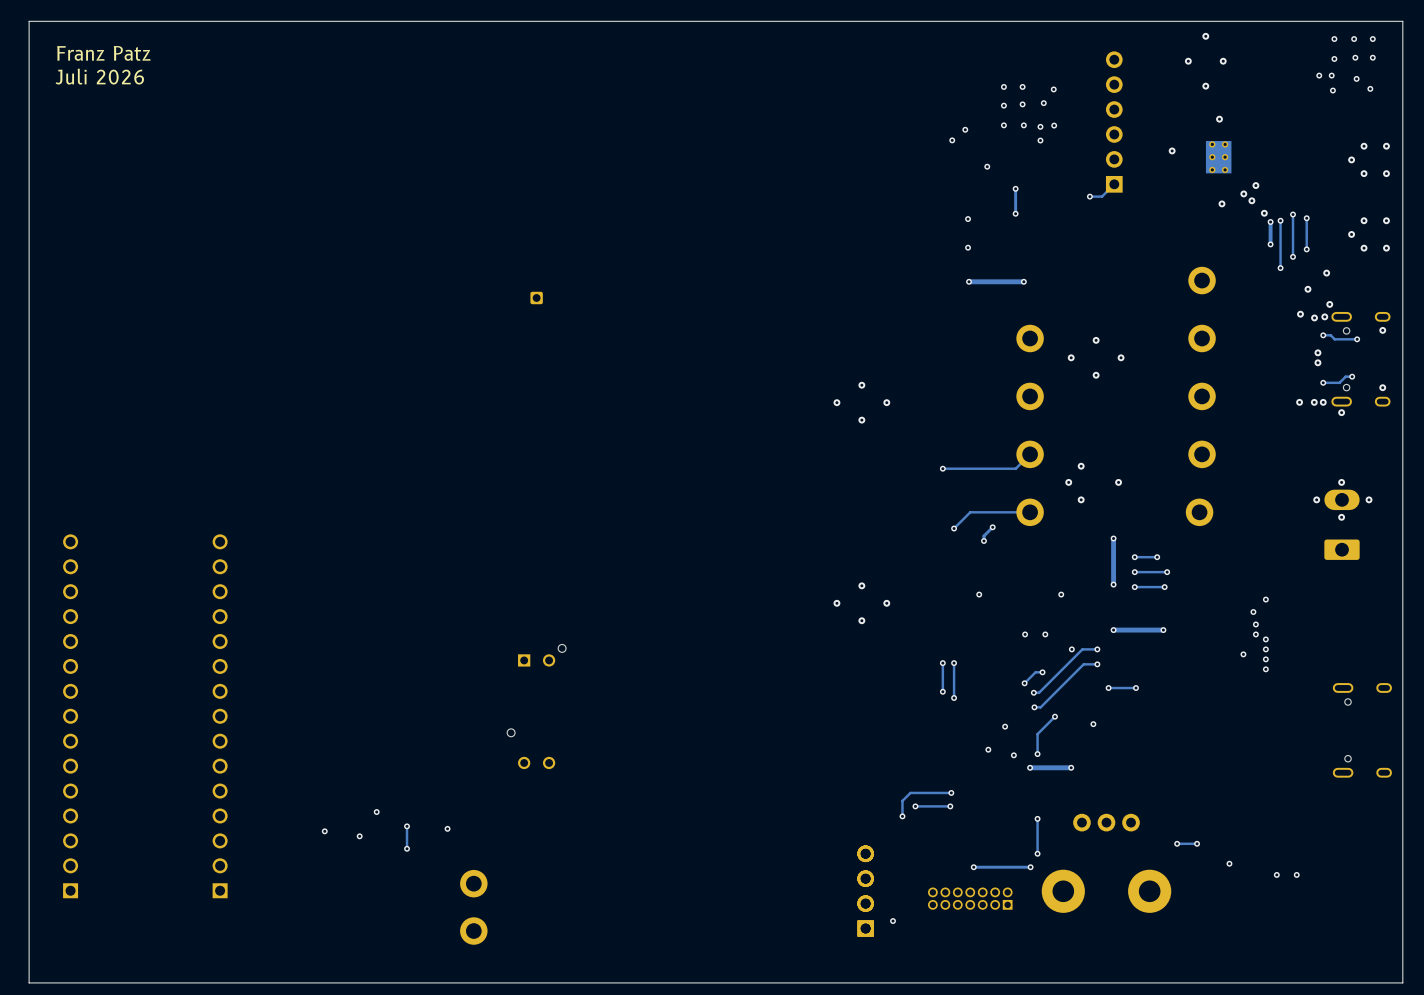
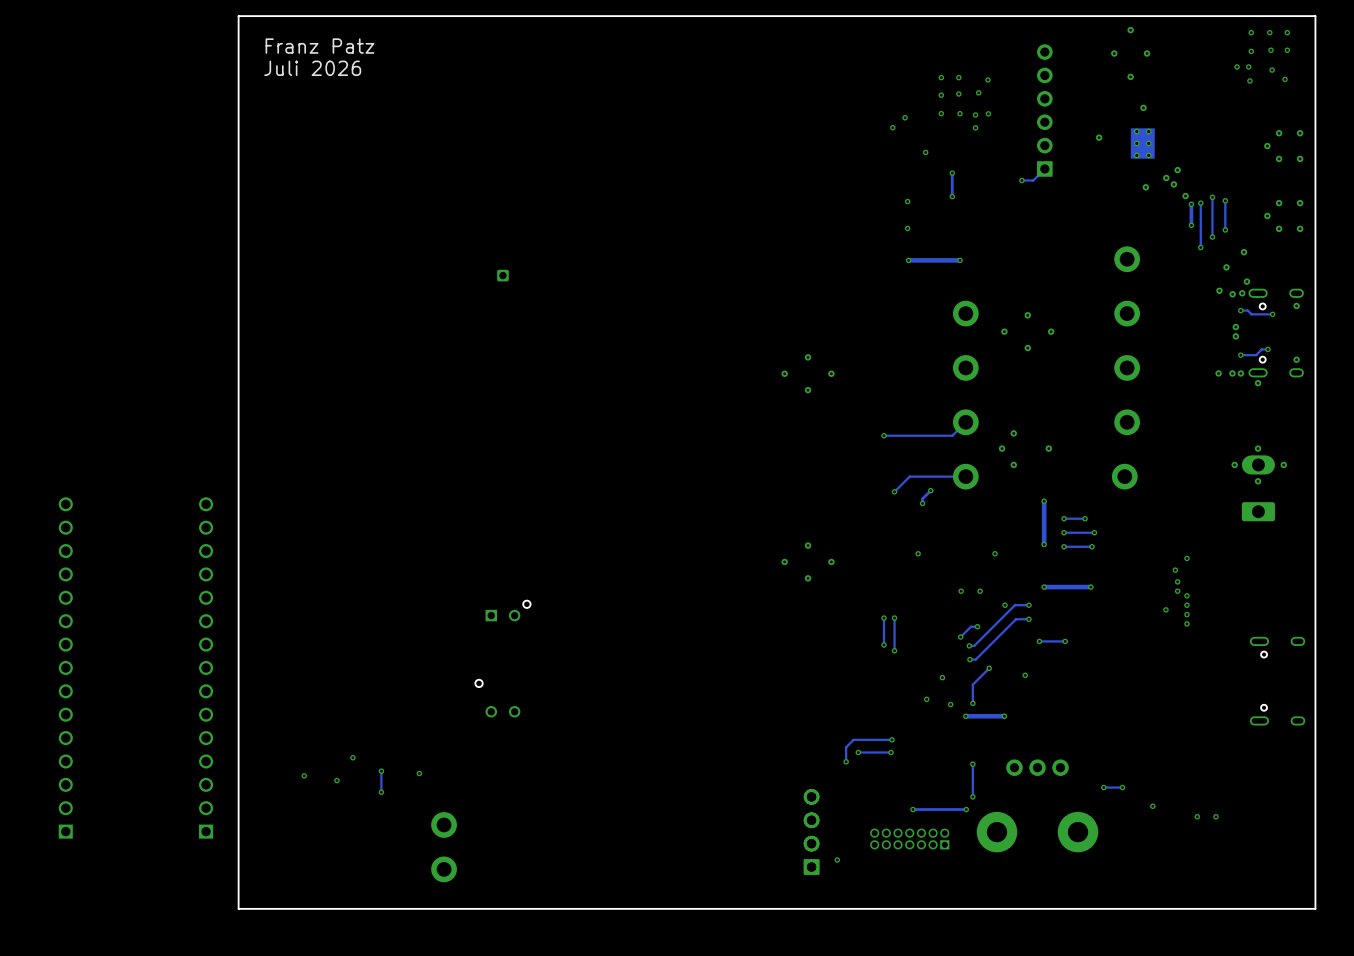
board edge: (254, 21) (29, 21) (29, 982) (1402, 982) (1402, 973) -> (238, 16) (238, 908) (1315, 908)
text position: Franz Patz (103, 53) -> Franz Patz (319, 46)
text position: Juli 2026 (99, 76) -> Juli 2026 (312, 68)

